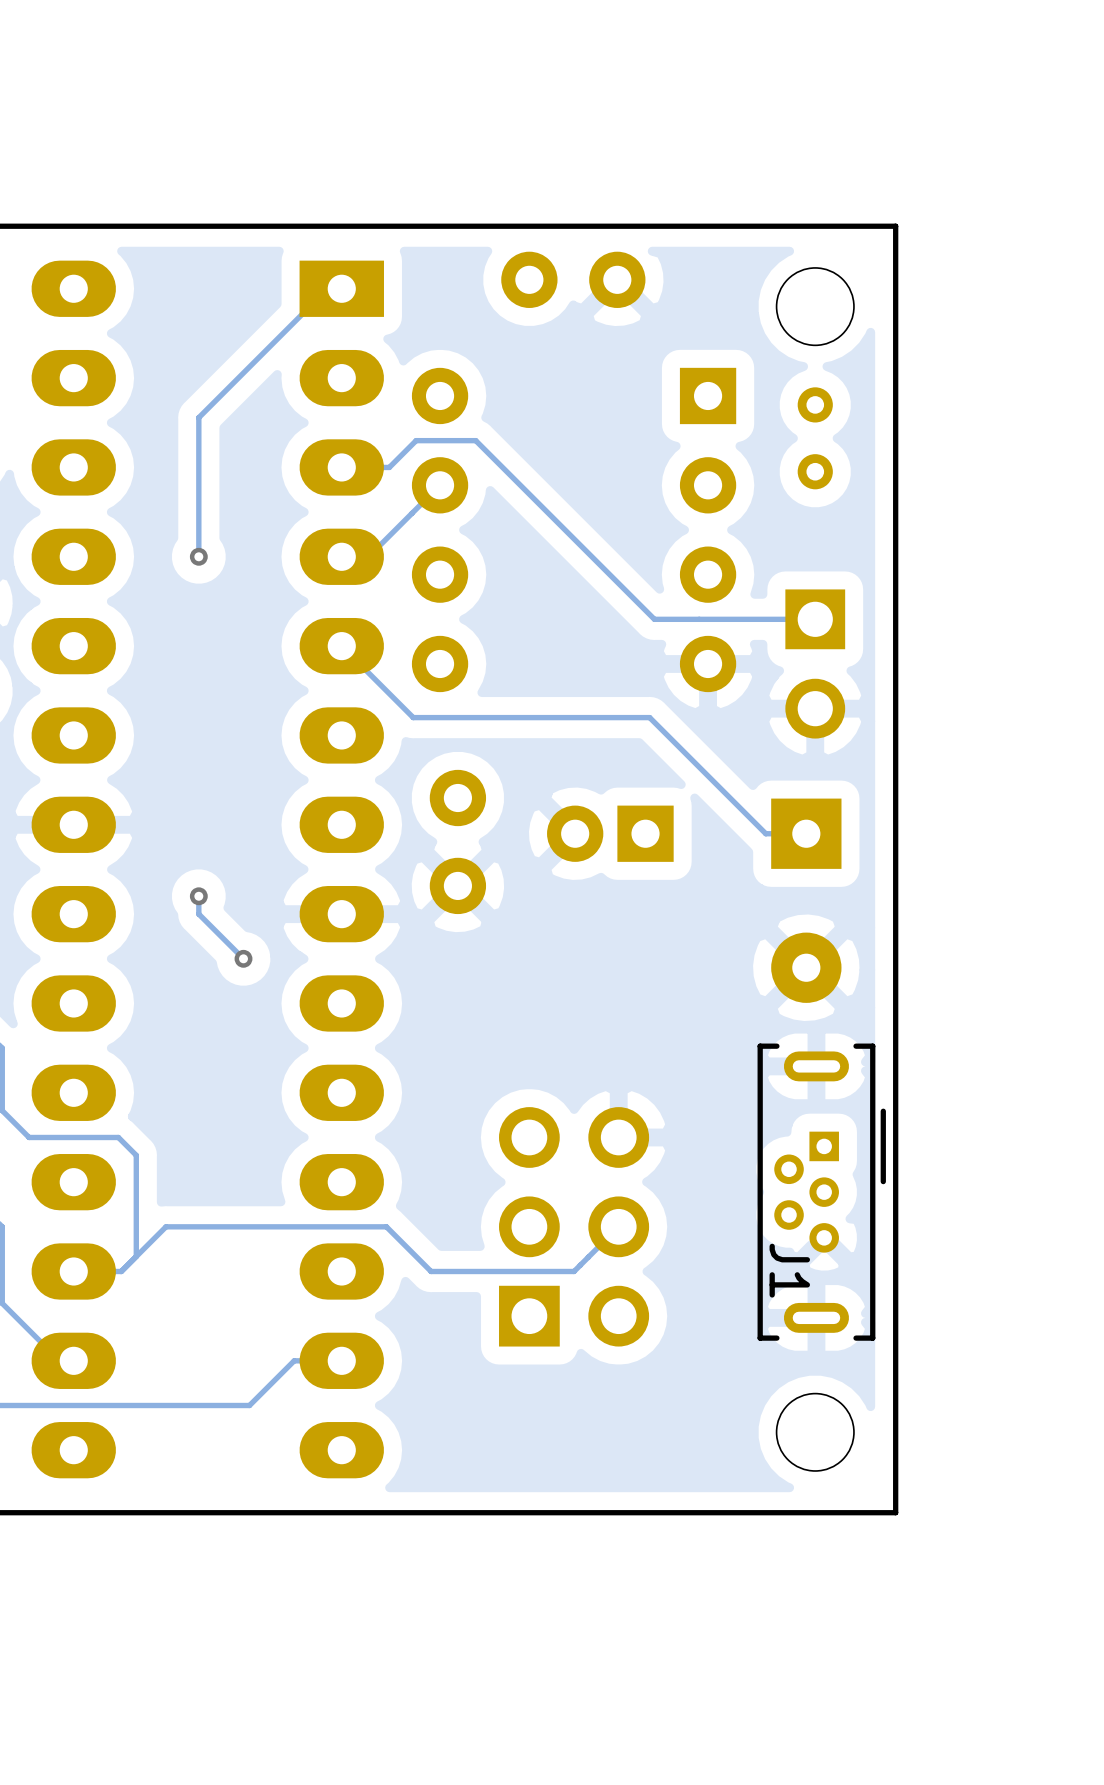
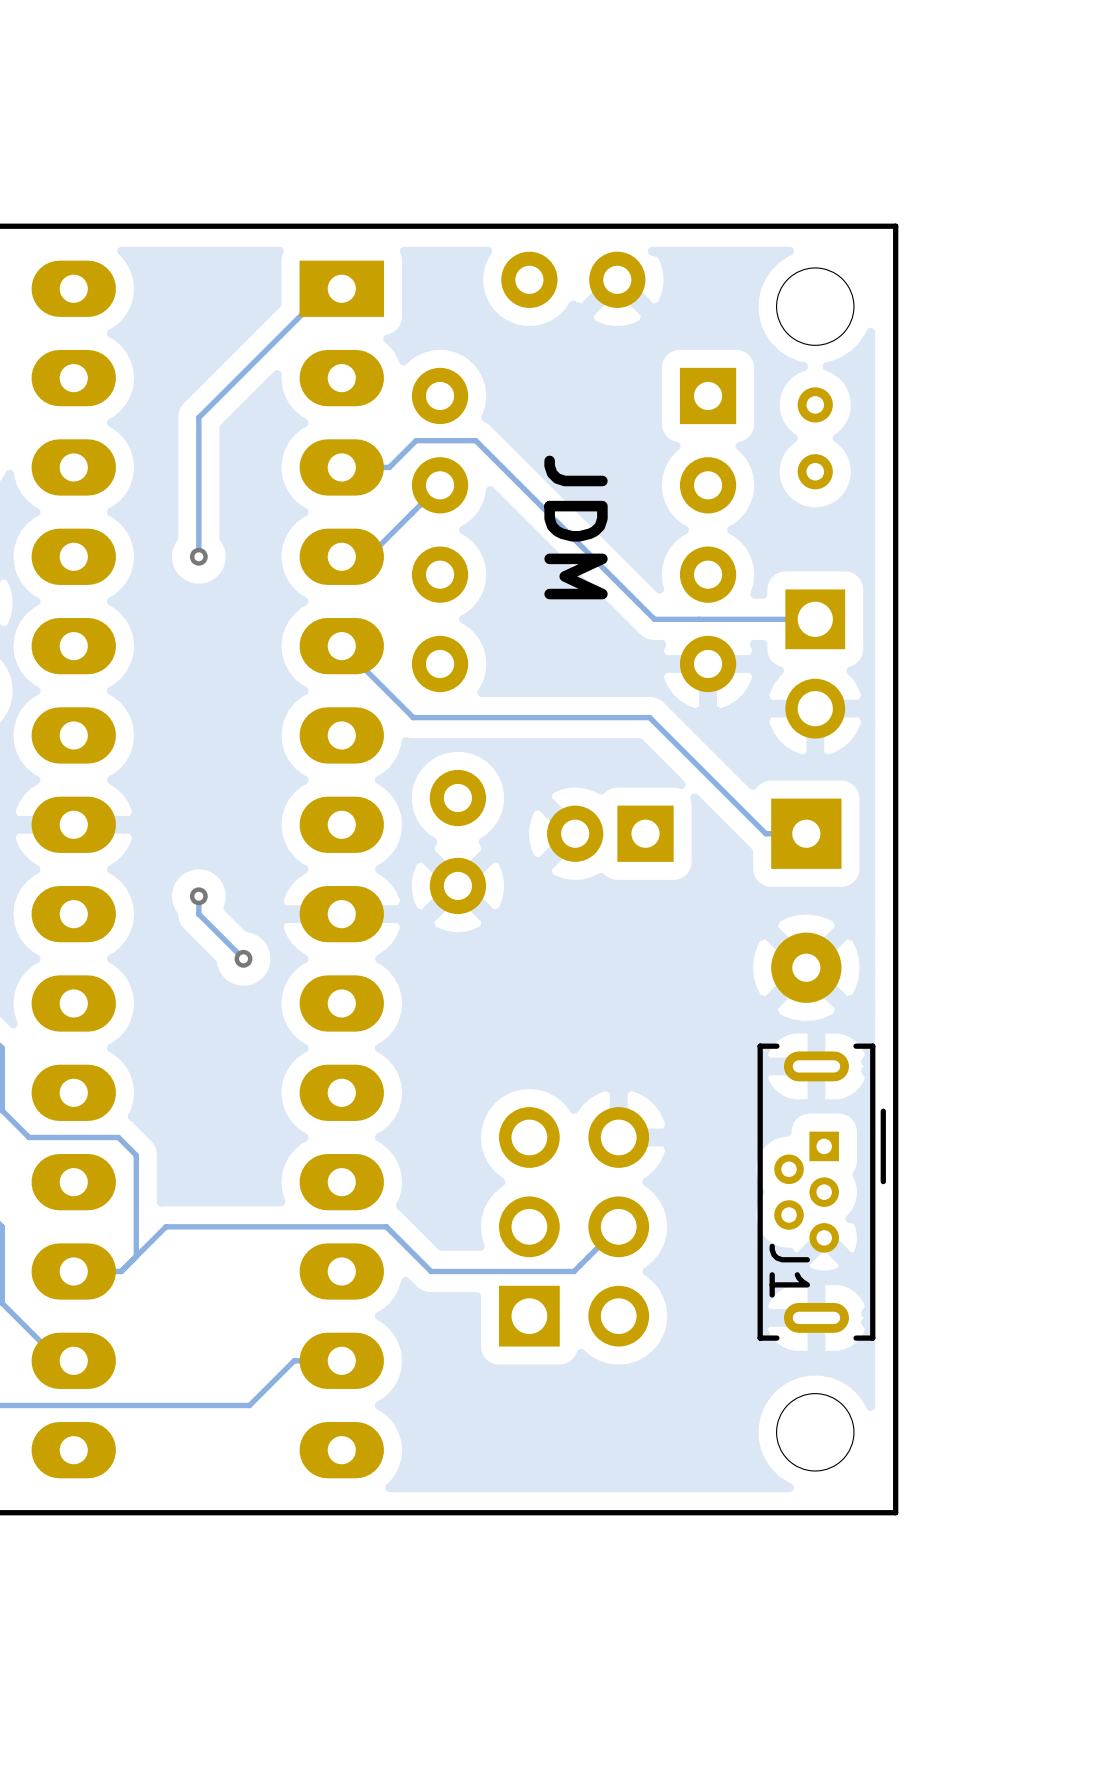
text: none -> JDM (576, 527)

